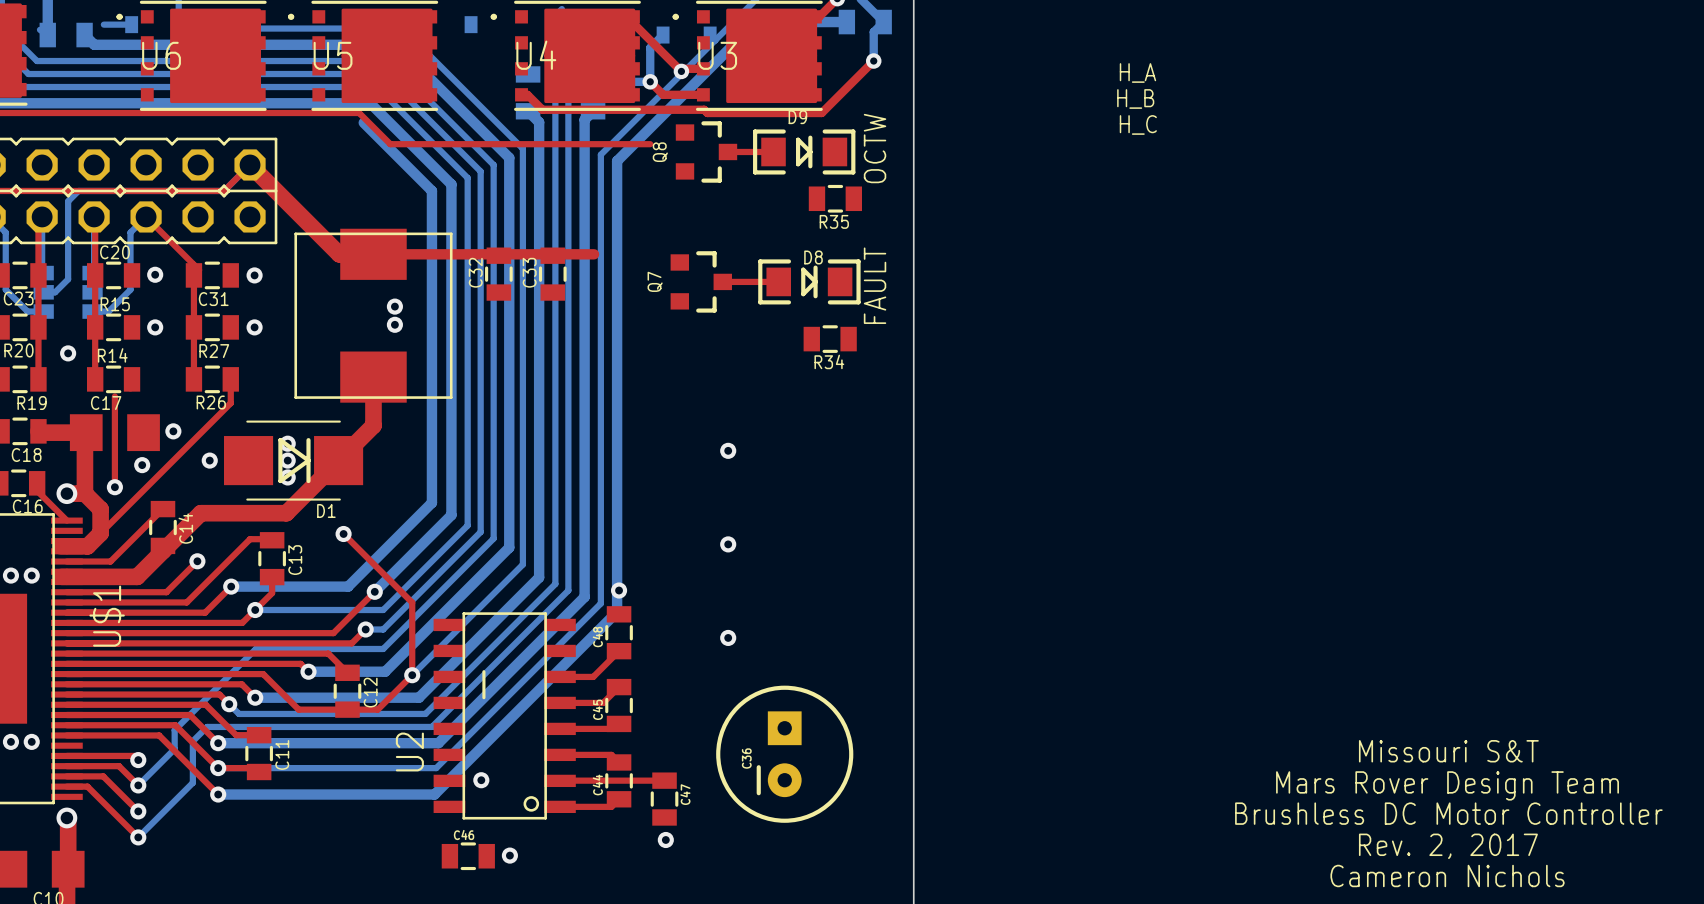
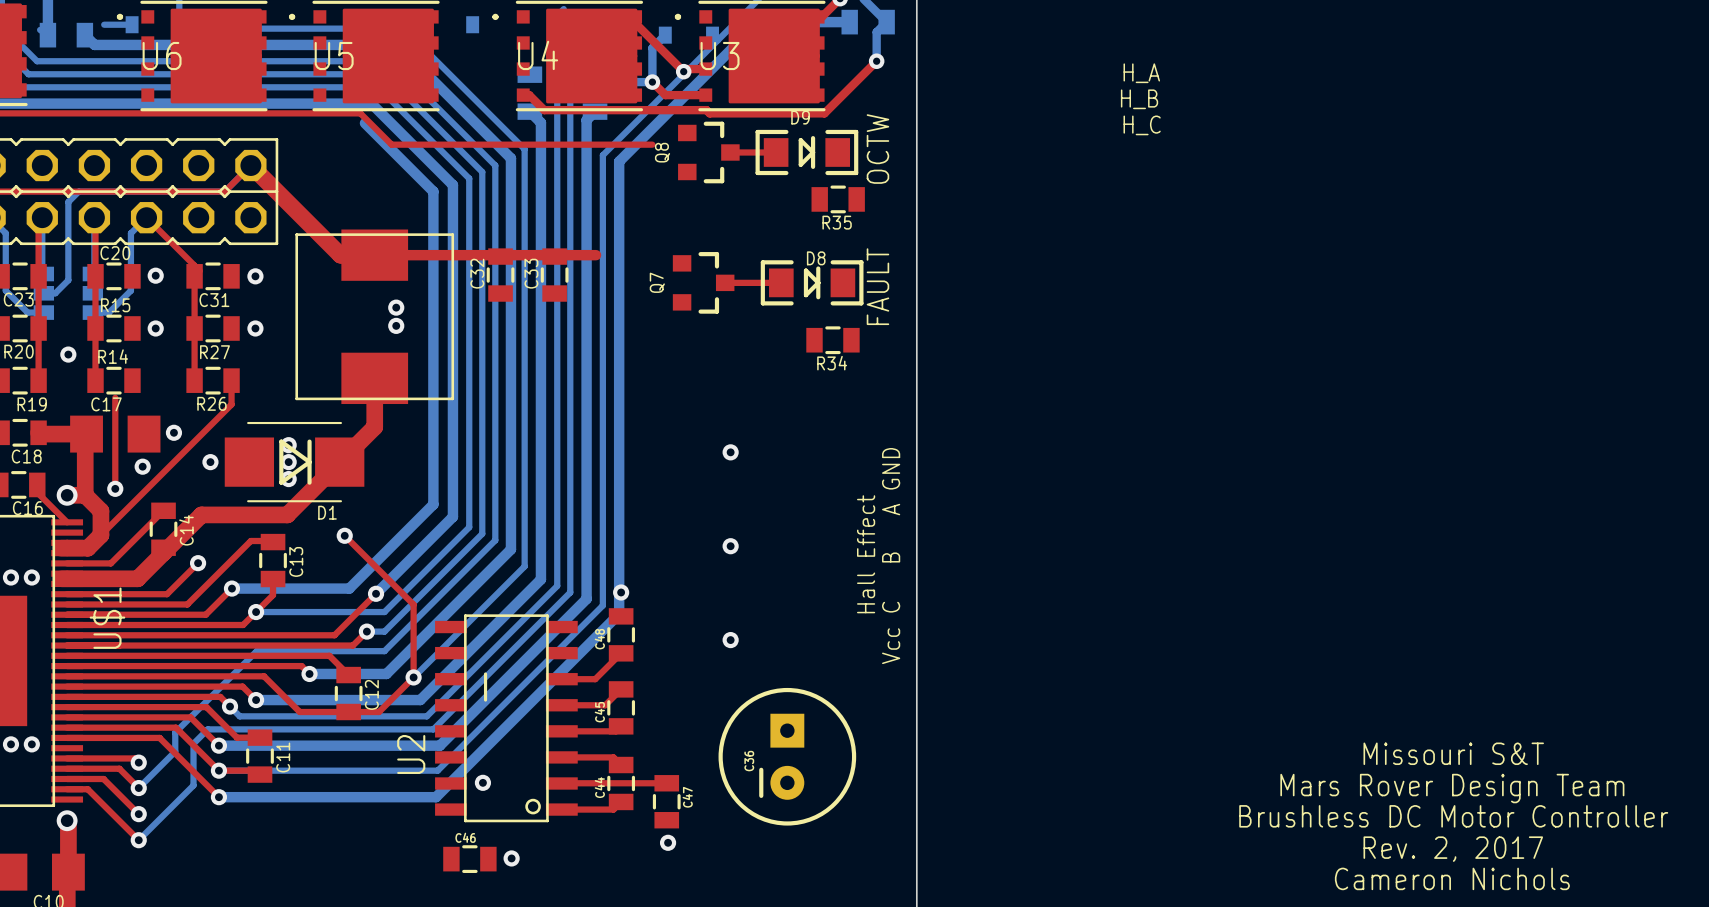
text: none -> Hall Effect (866, 554)
text: none -> Vcc C B A GND (891, 556)

